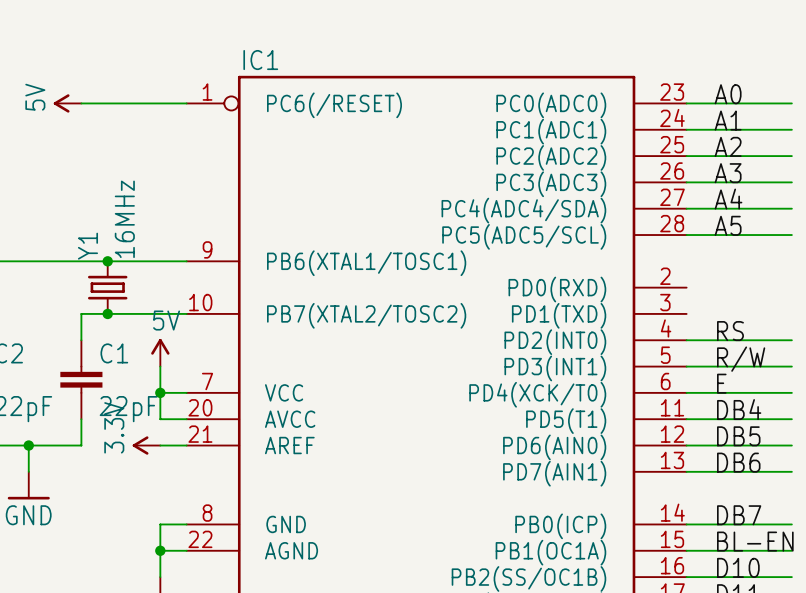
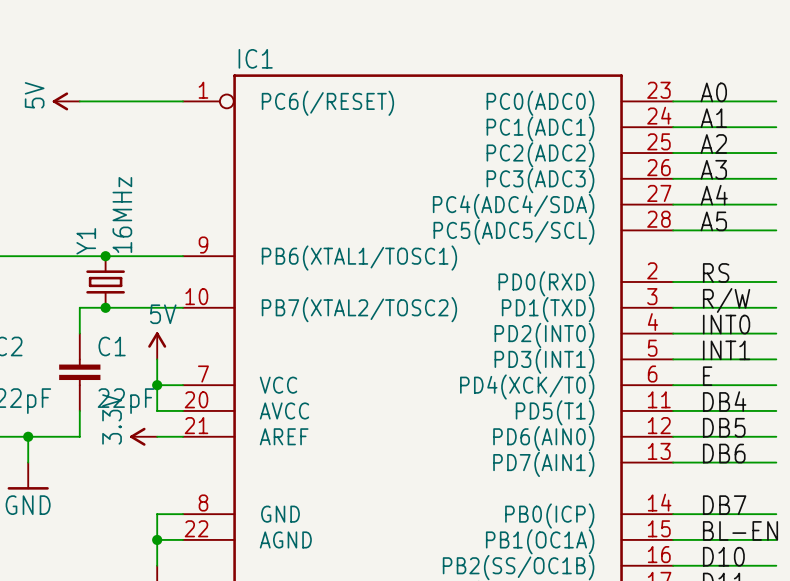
label: none -> RS (716, 272)
wire: none -> (673, 281) (776, 281)
label: none -> R/W (726, 300)
wire: none -> (673, 307) (776, 307)
label: RS (730, 331) -> INT0 (726, 324)
label: R/W (741, 359) -> INT1 (726, 350)

